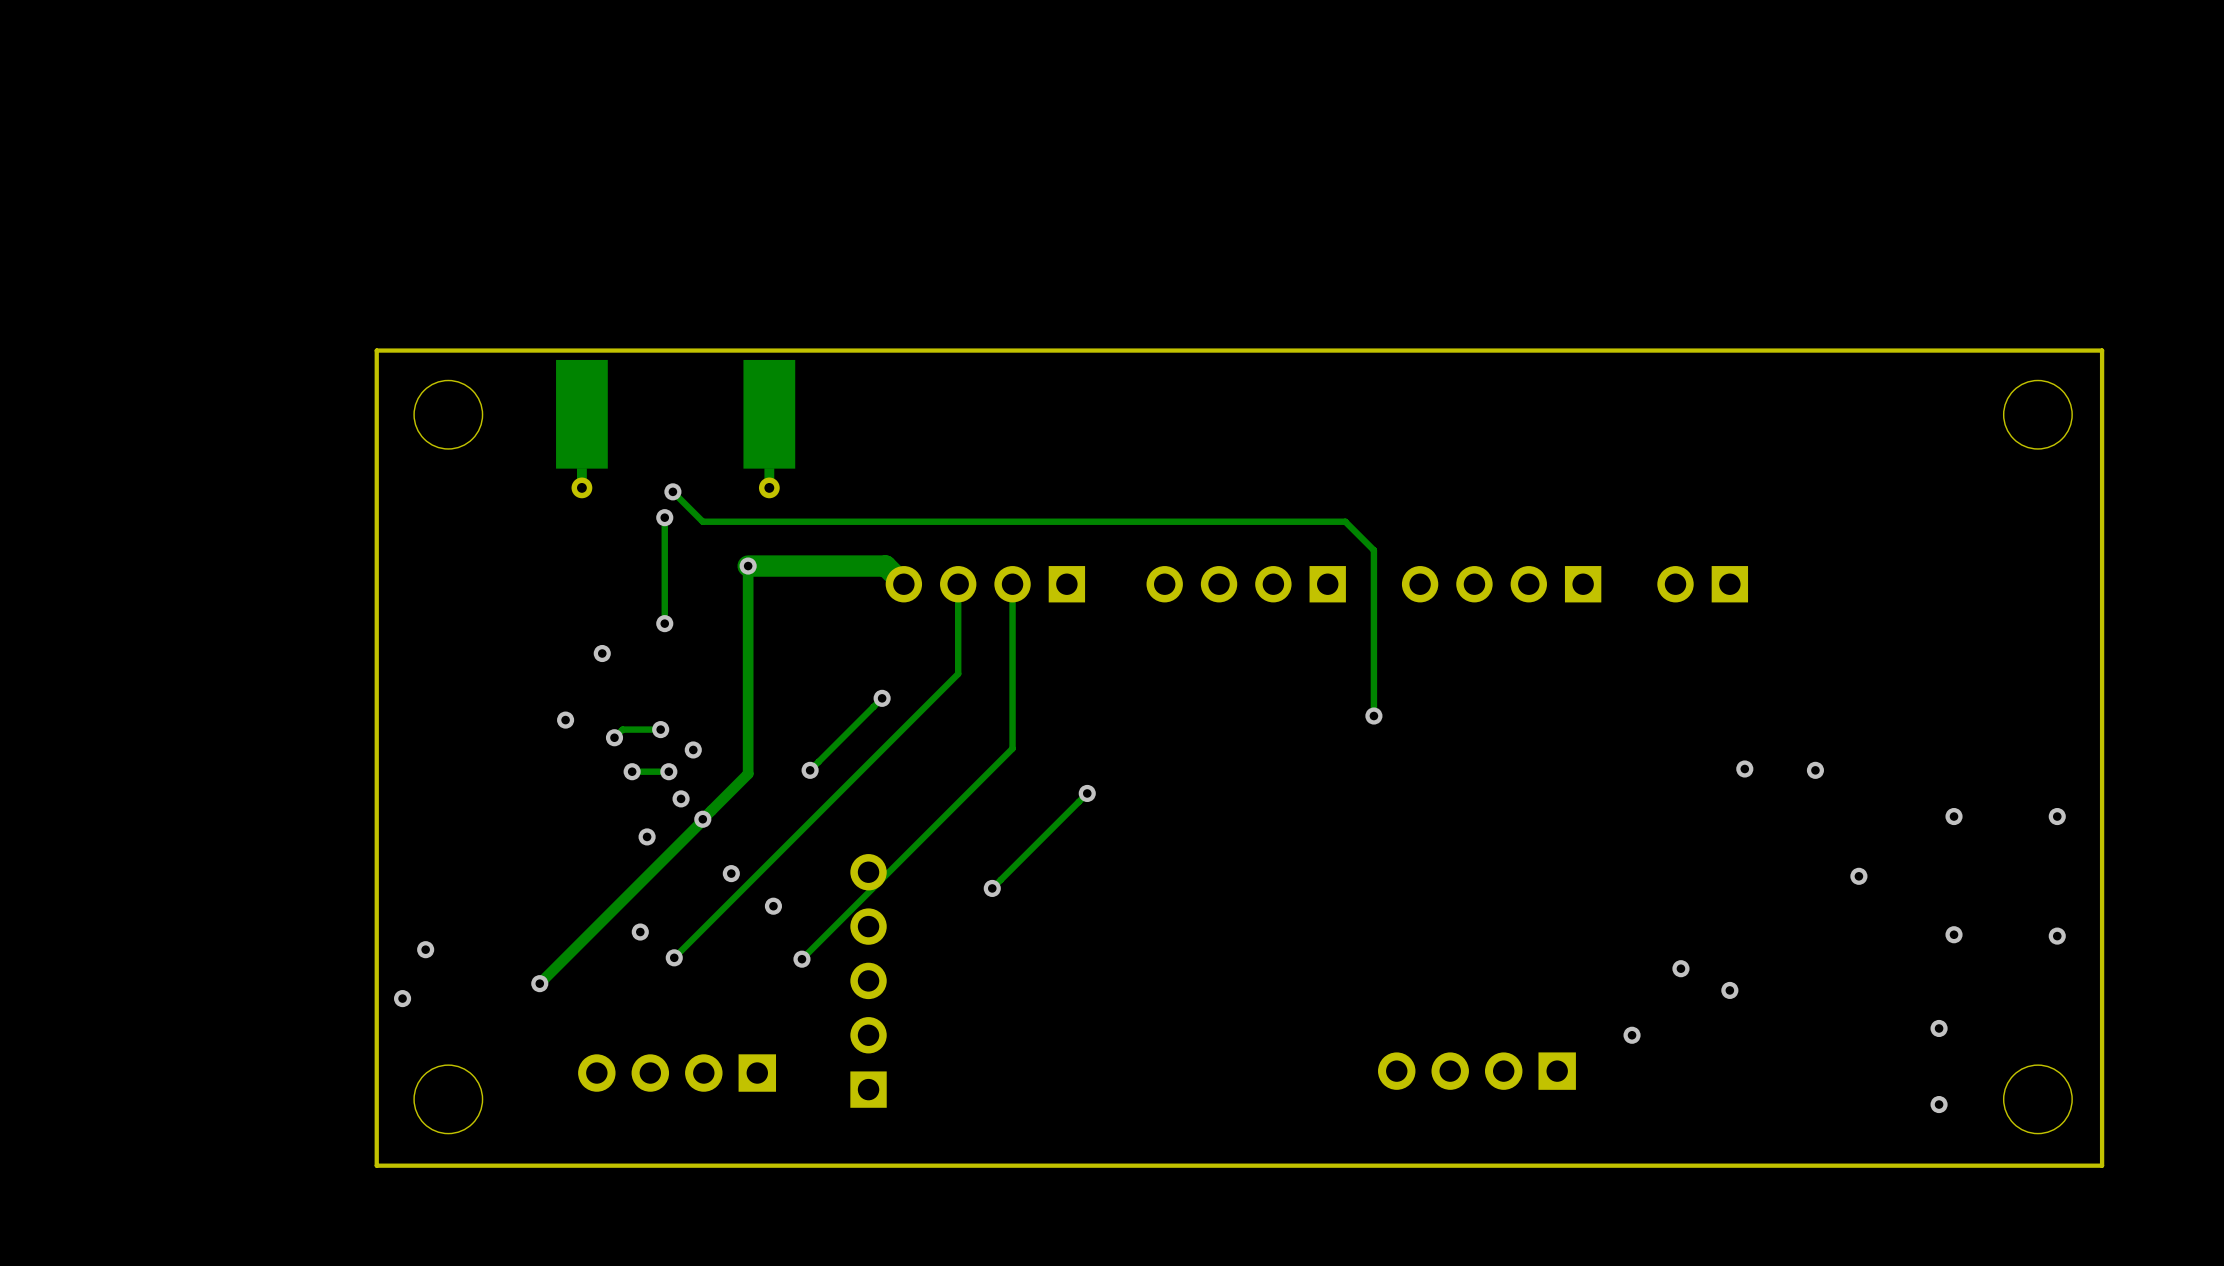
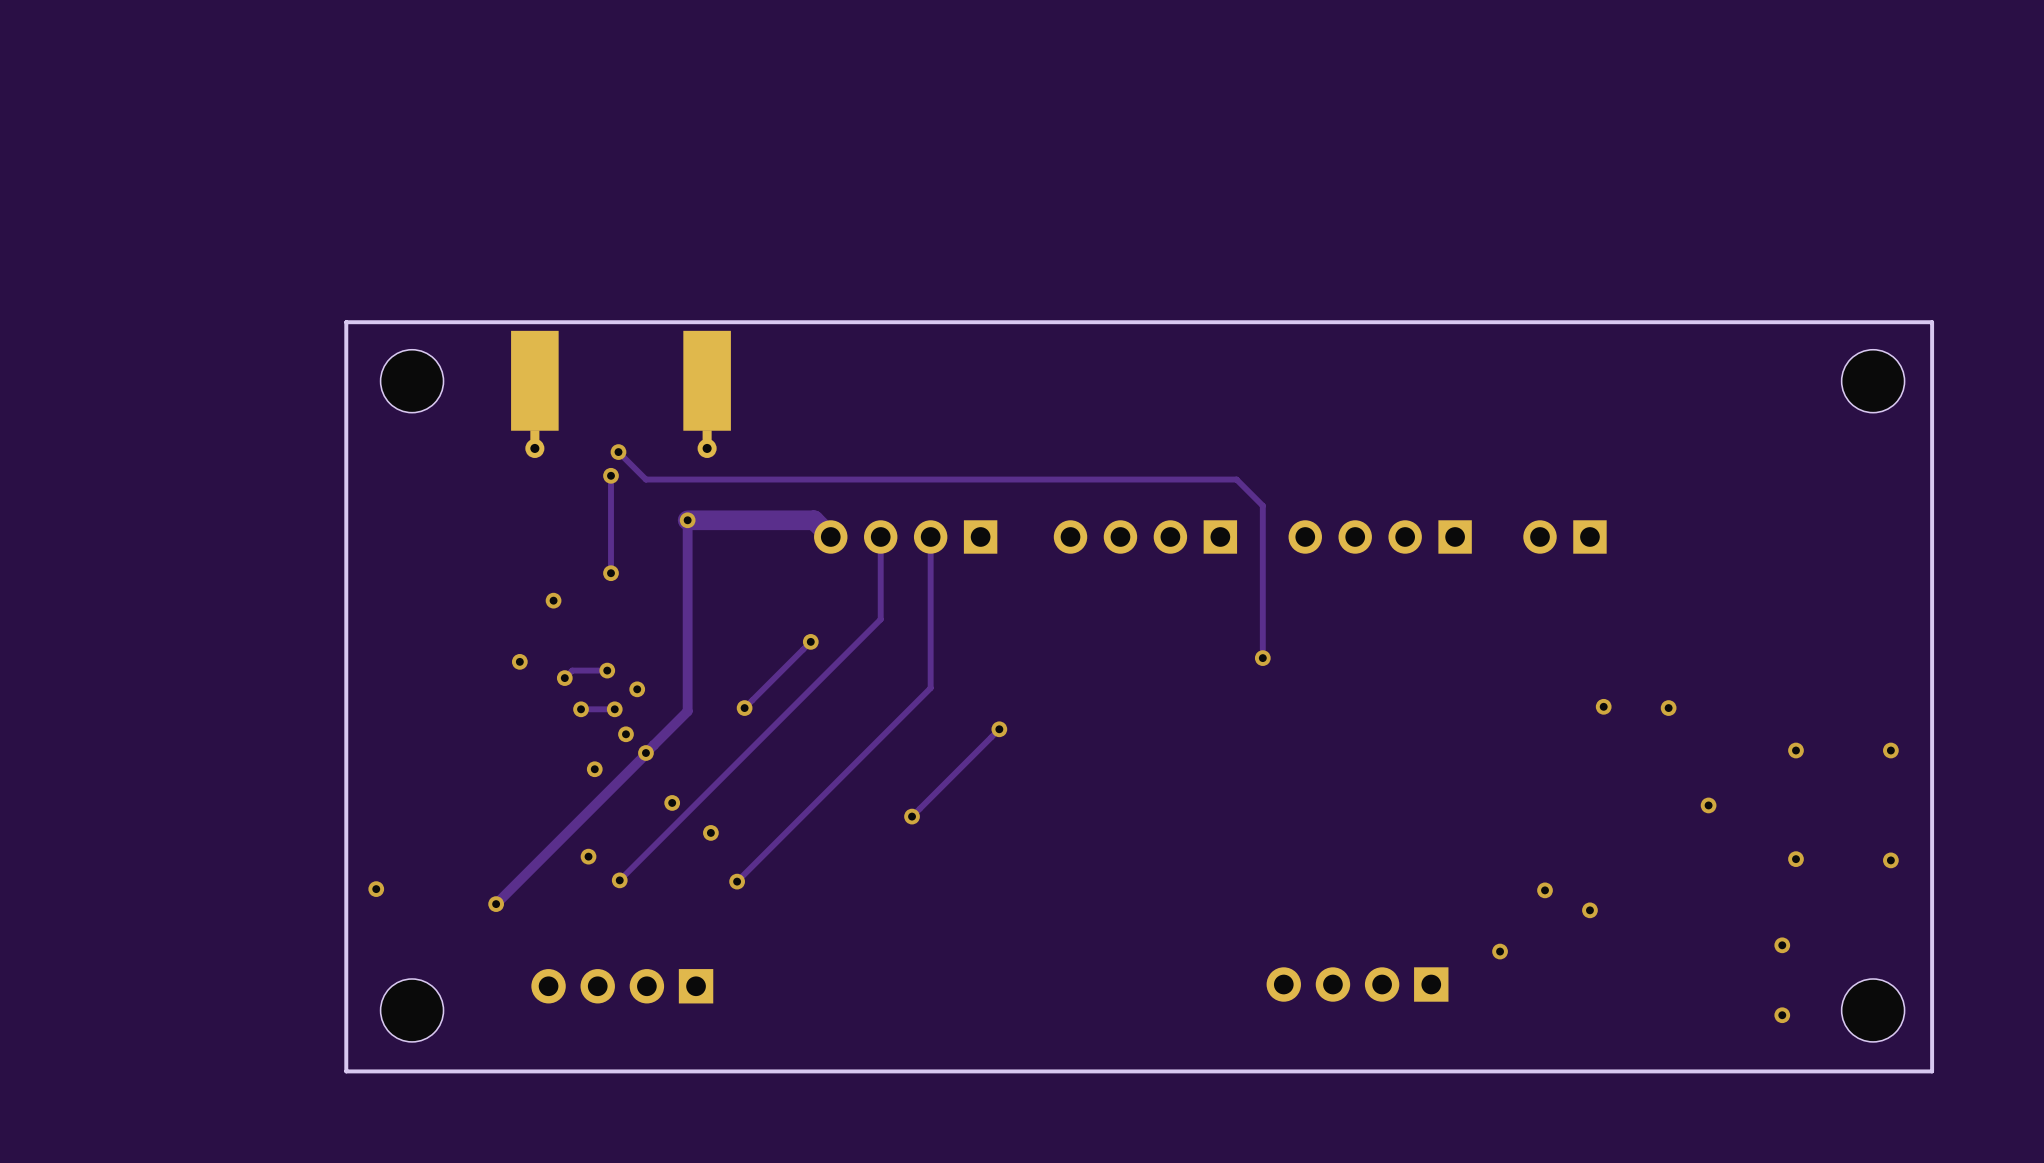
via: (425, 949) -> none
via: none -> (376, 889)
part: (868, 980) -> none
via: (402, 998) -> none

